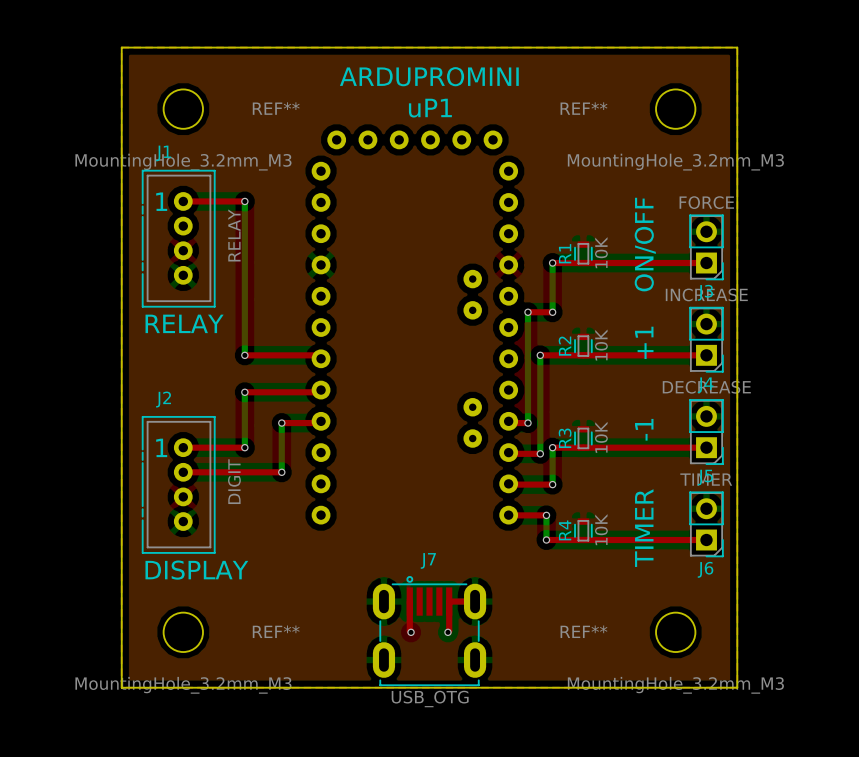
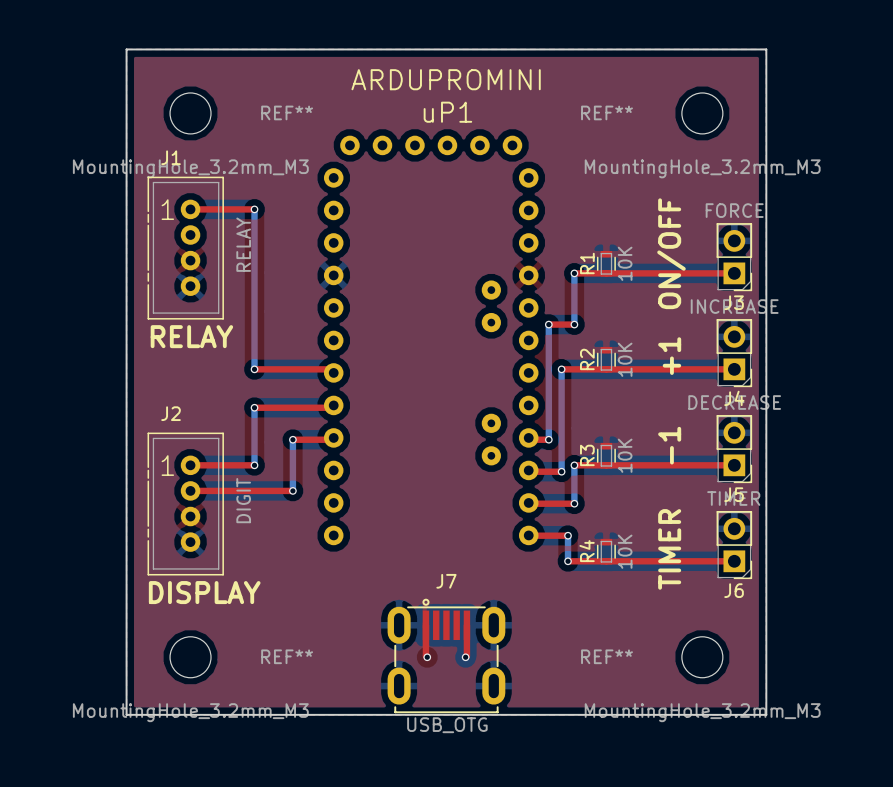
top track: (449, 601) (475, 601) -> none

